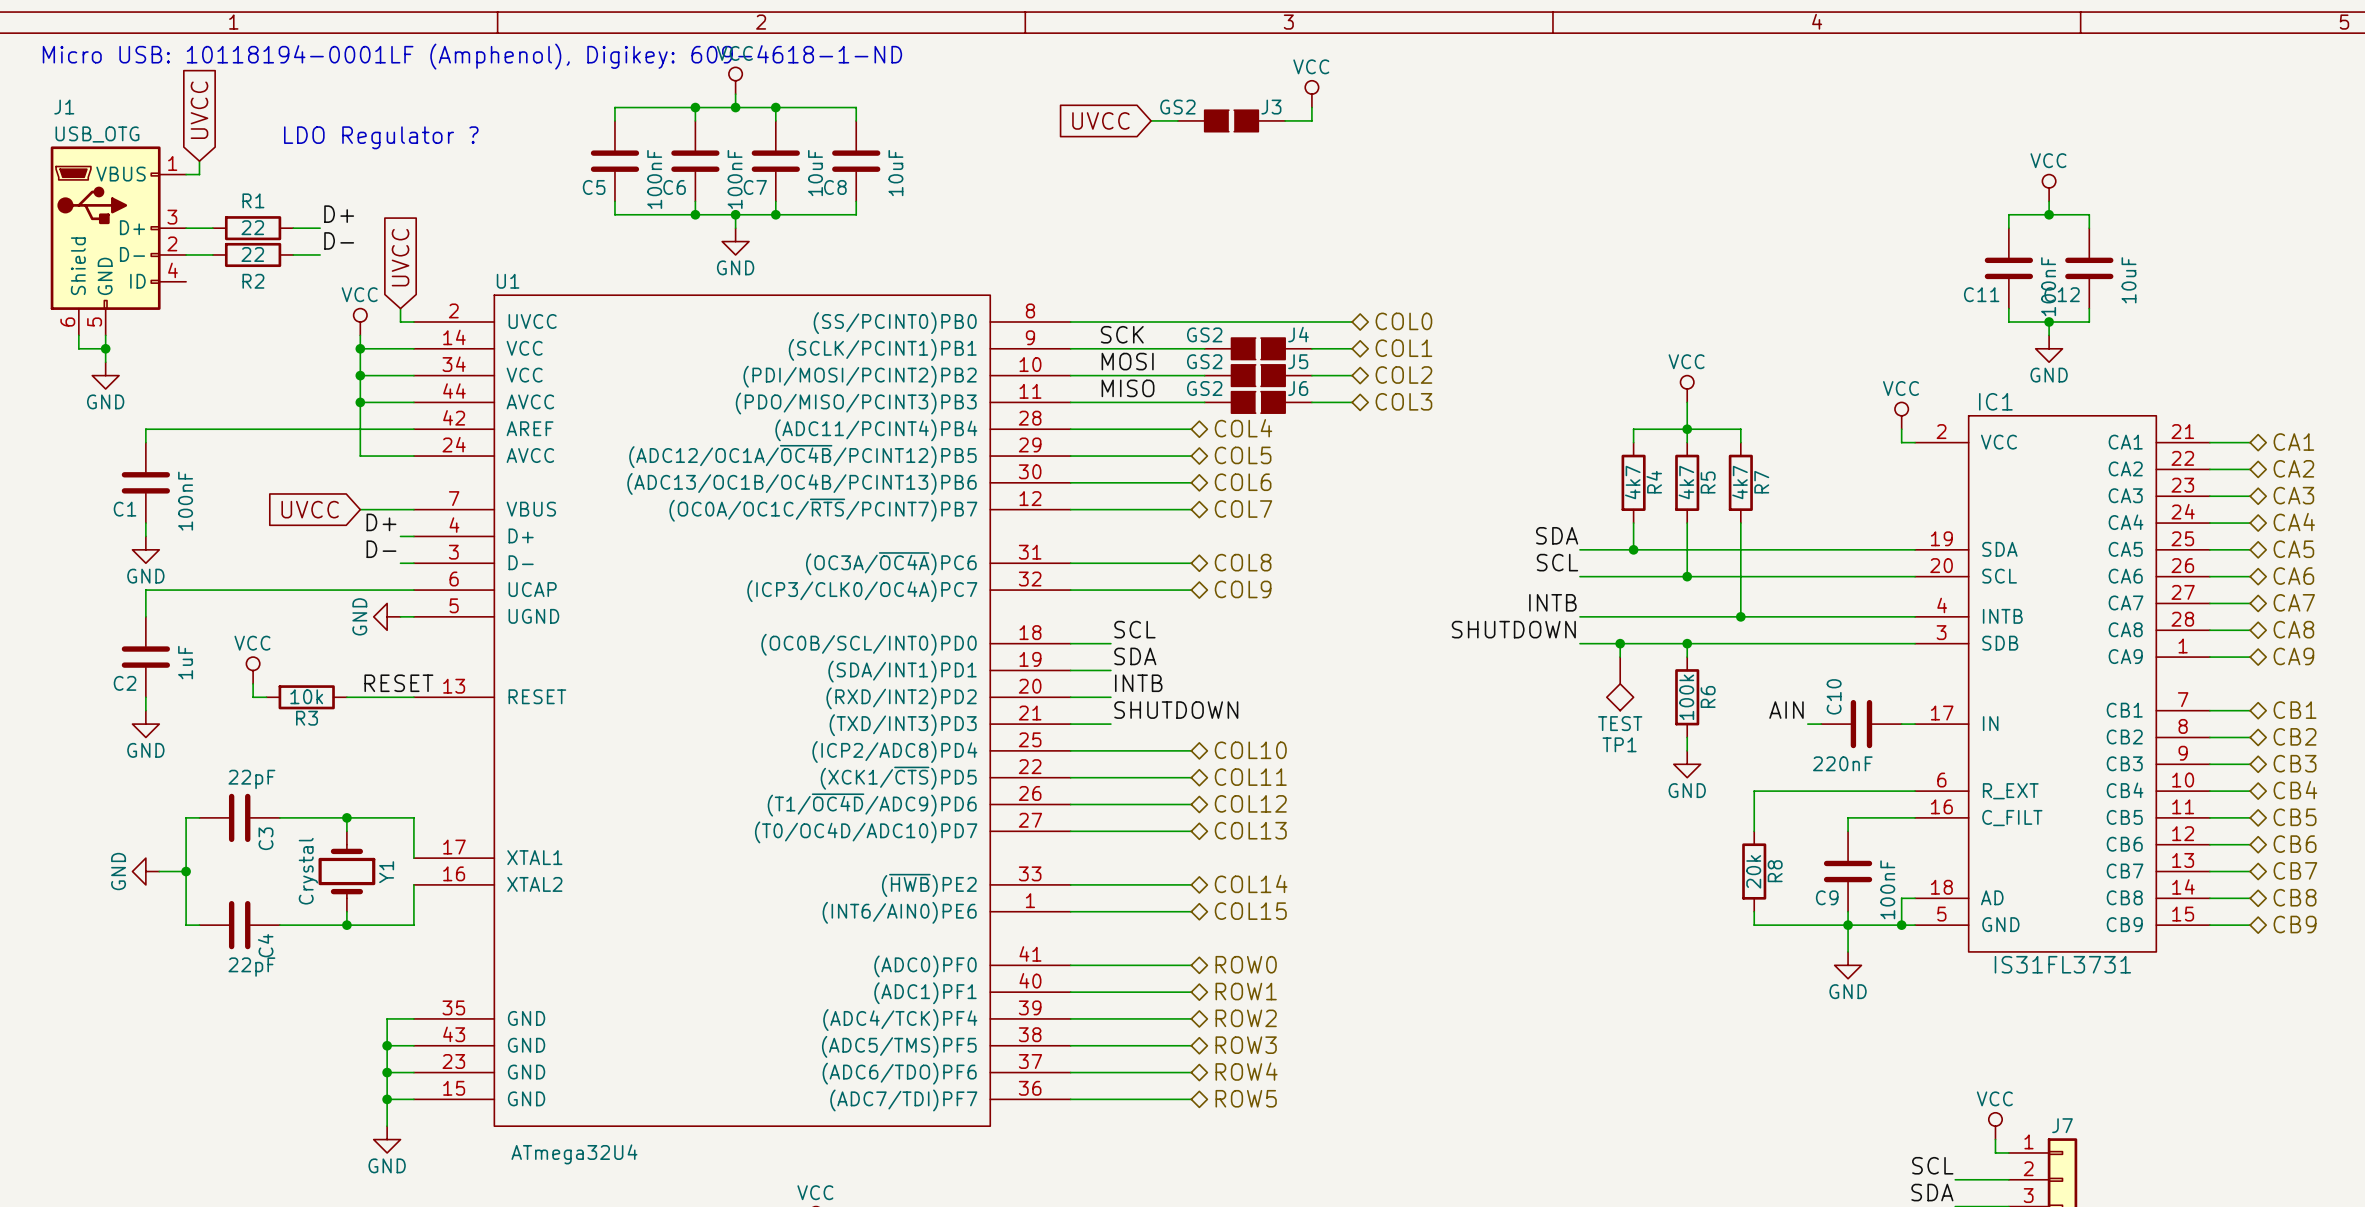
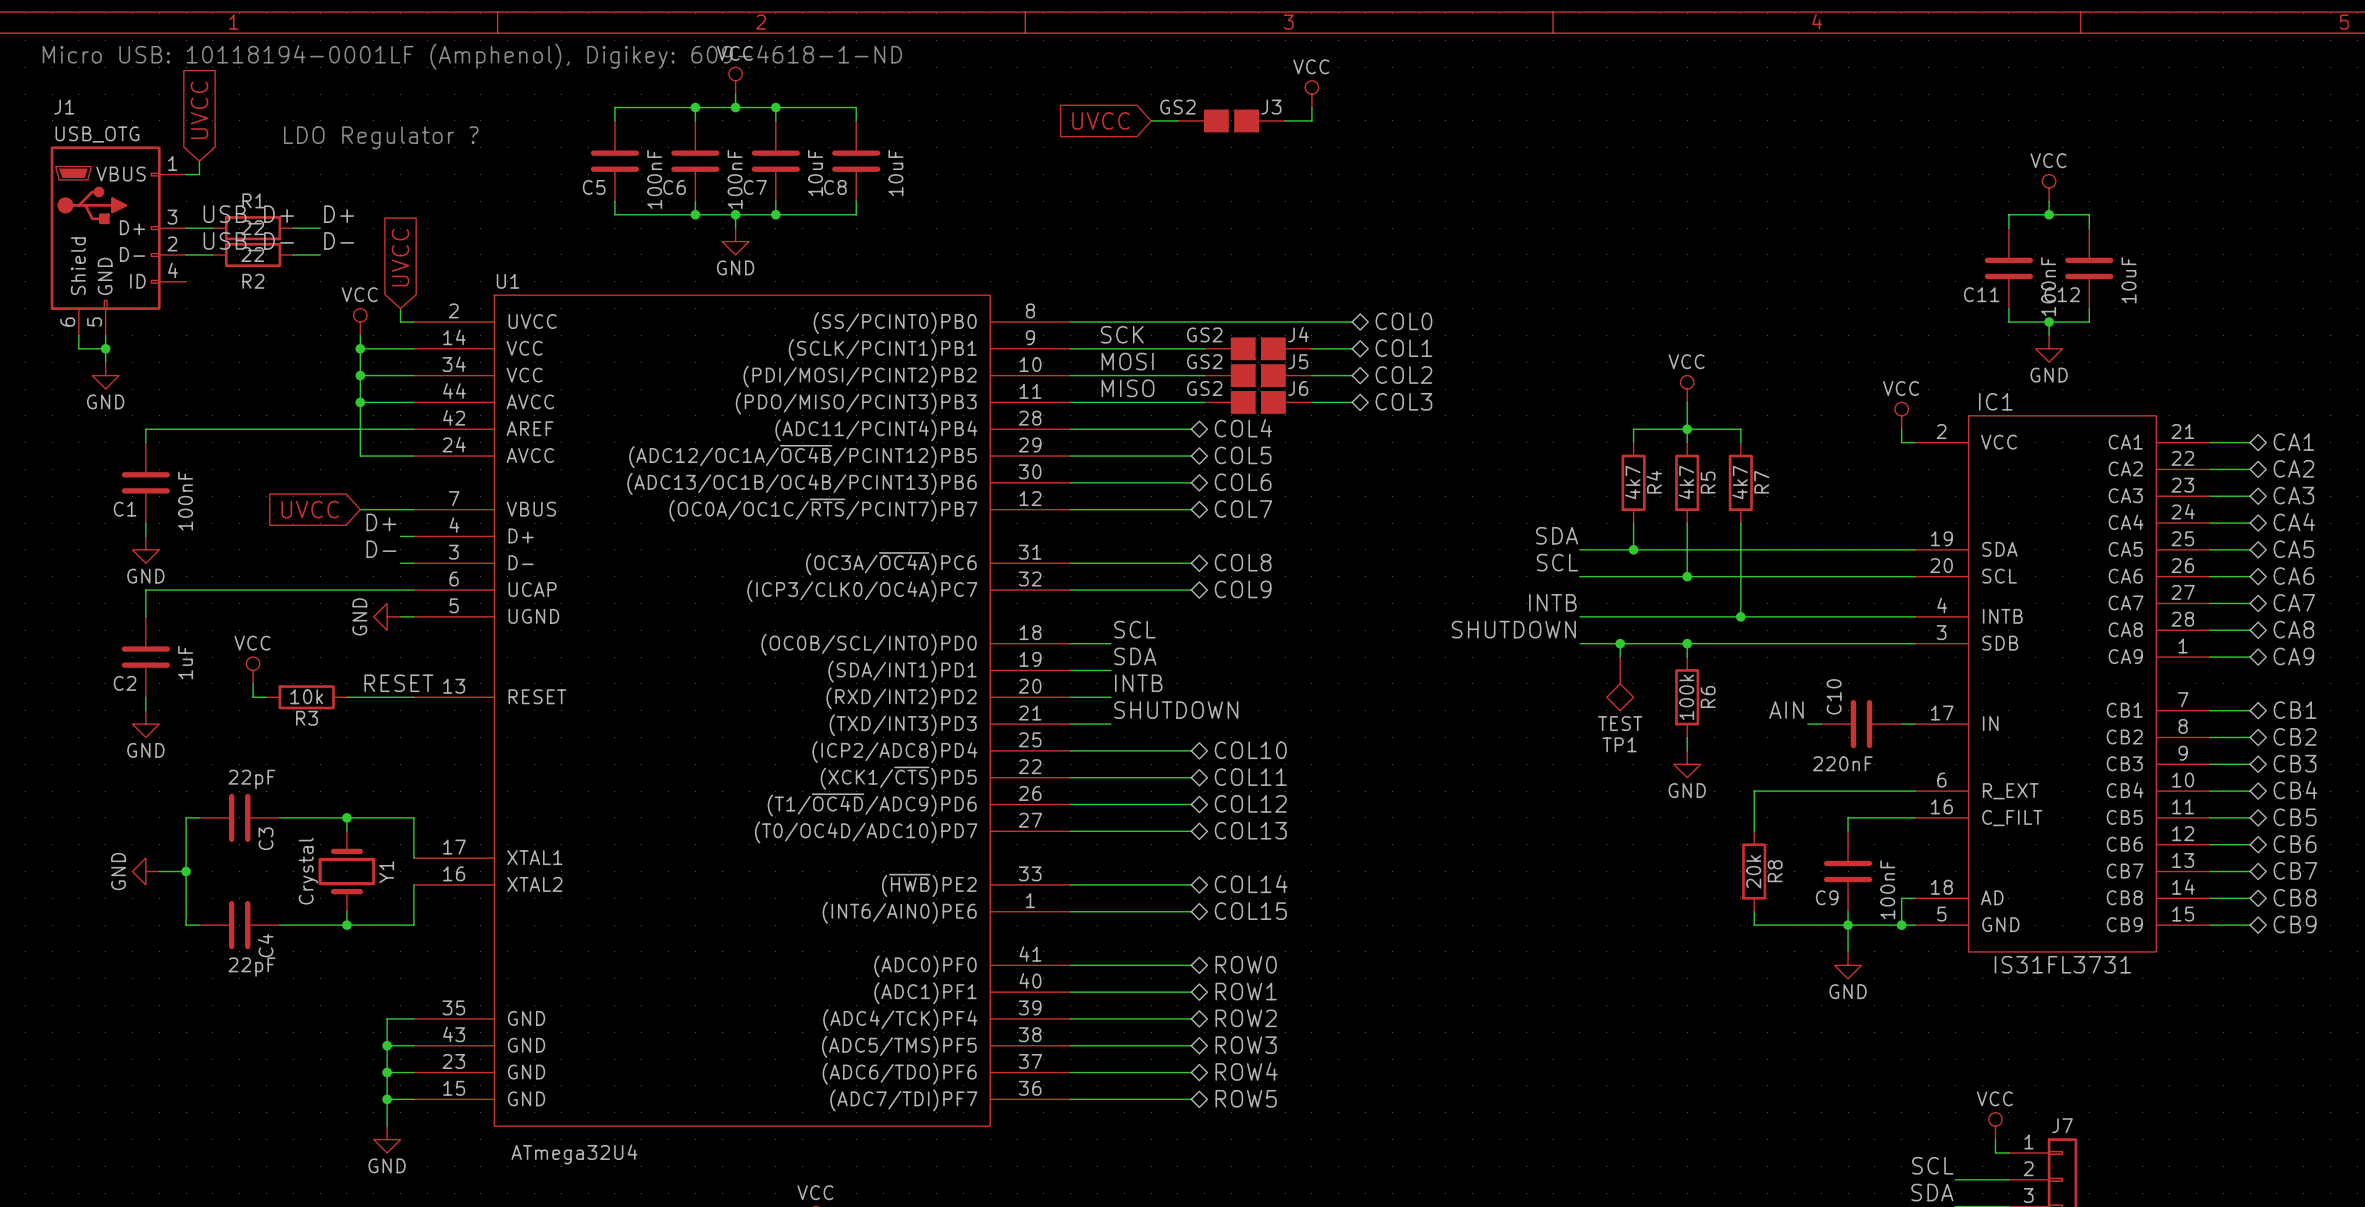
label: none -> USB_D+ (248, 214)
label: none -> USB_D- (248, 241)

